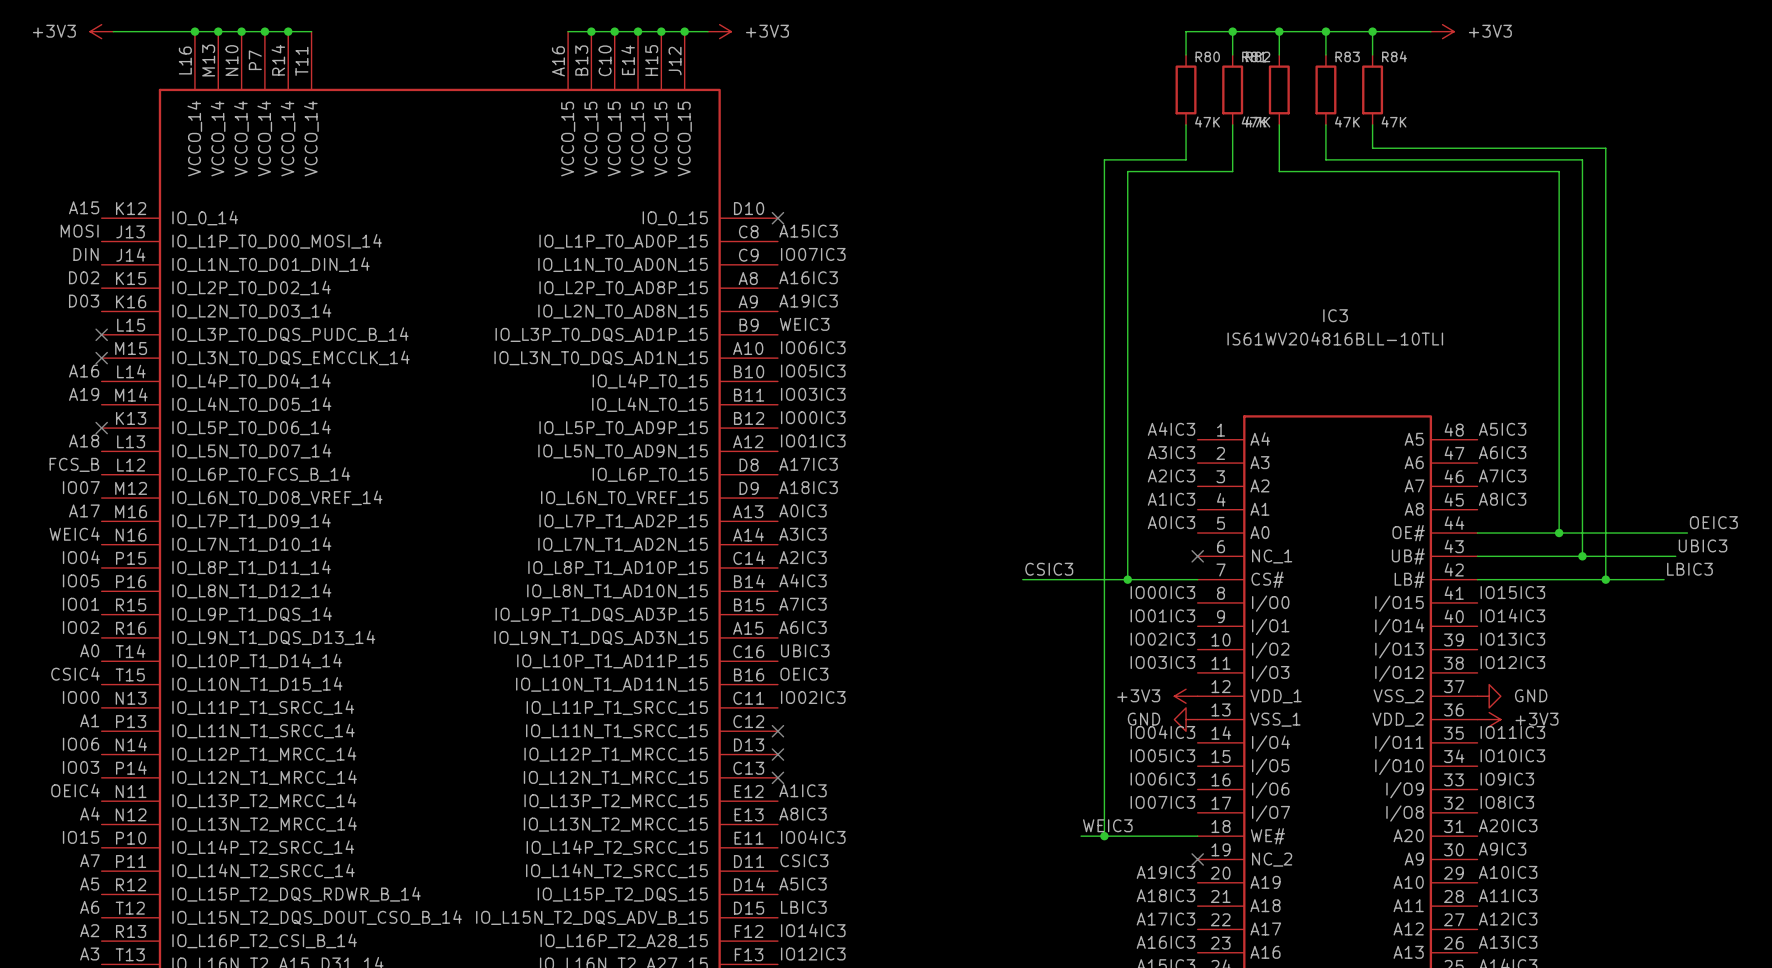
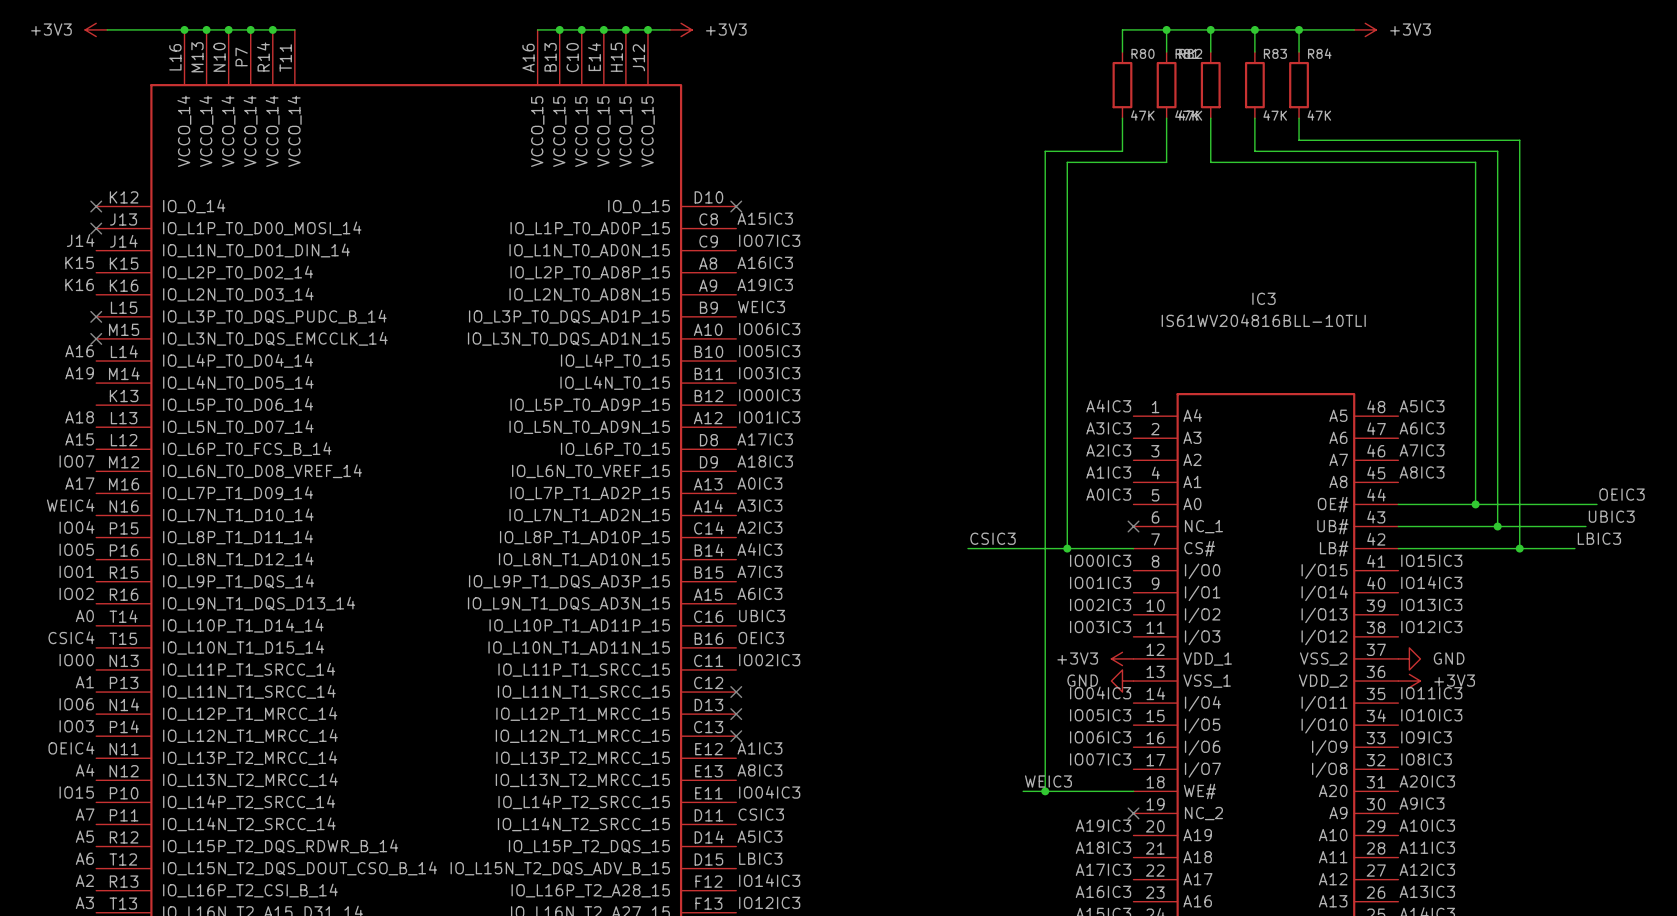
label: A15 (84, 207) -> none
no-connect mark: none -> (96, 206)
label: MOSI (79, 231) -> none
no-connect mark: none -> (96, 228)
label: DIN (86, 254) -> J14 (80, 240)
label: D02 (84, 277) -> K15 (79, 262)
label: D03 (84, 301) -> K16 (79, 284)
no-connect mark: (101, 428) -> none
label: FCS_B (74, 464) -> A15 (79, 439)

